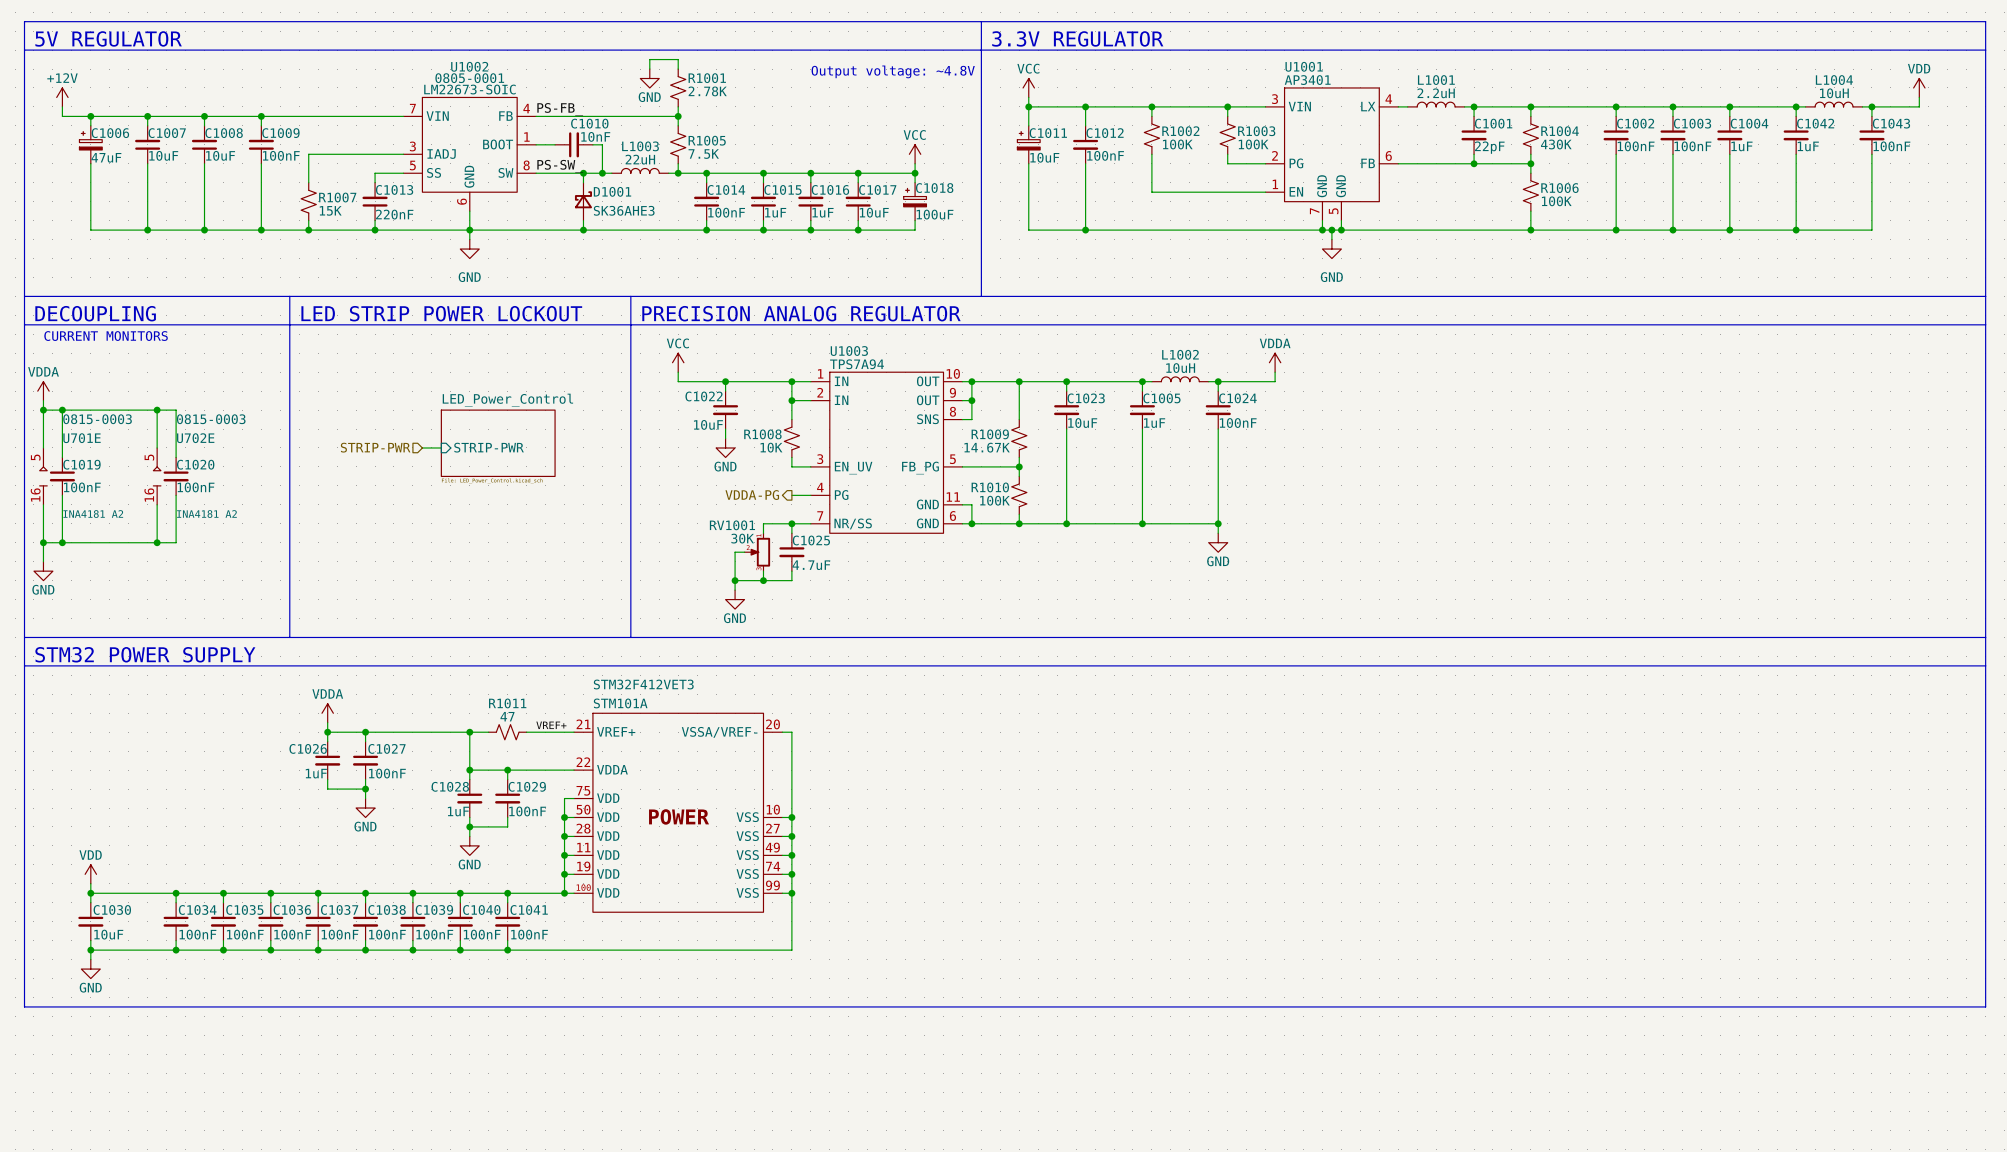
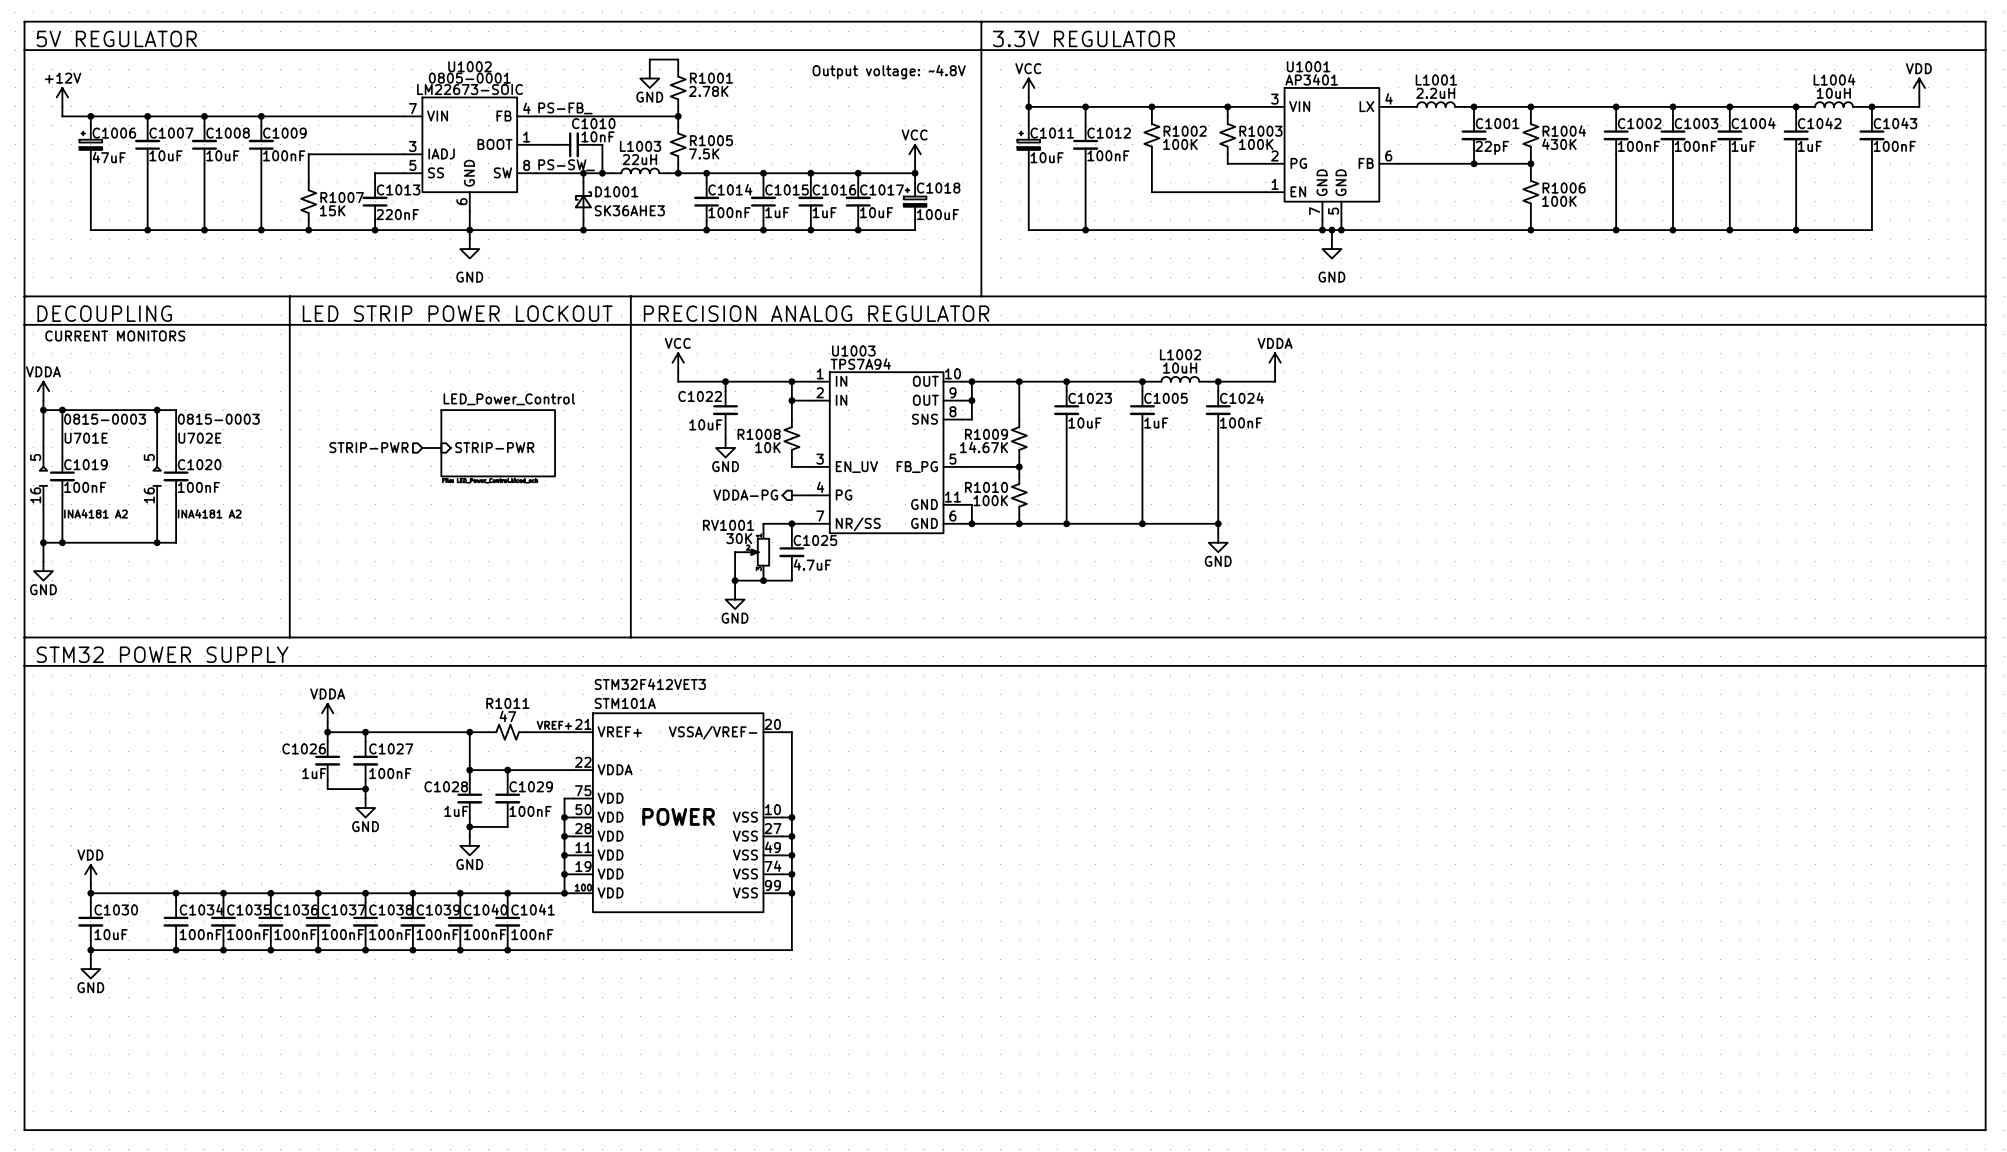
line: (24, 1006) (1985, 1006) -> (24, 1006) (24, 1130) (1985, 1130) (1985, 1006)

